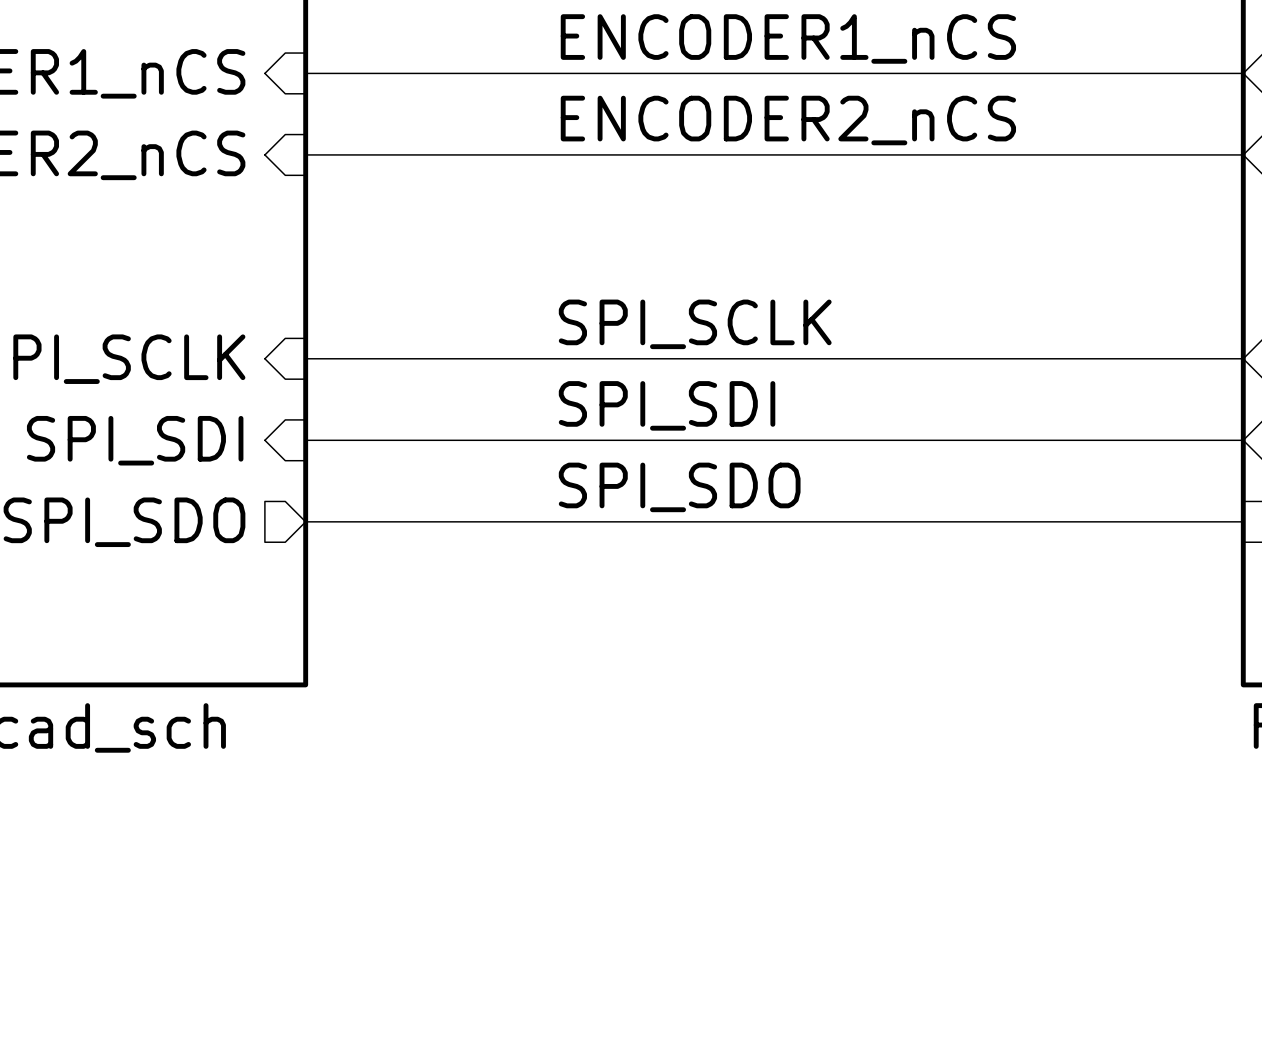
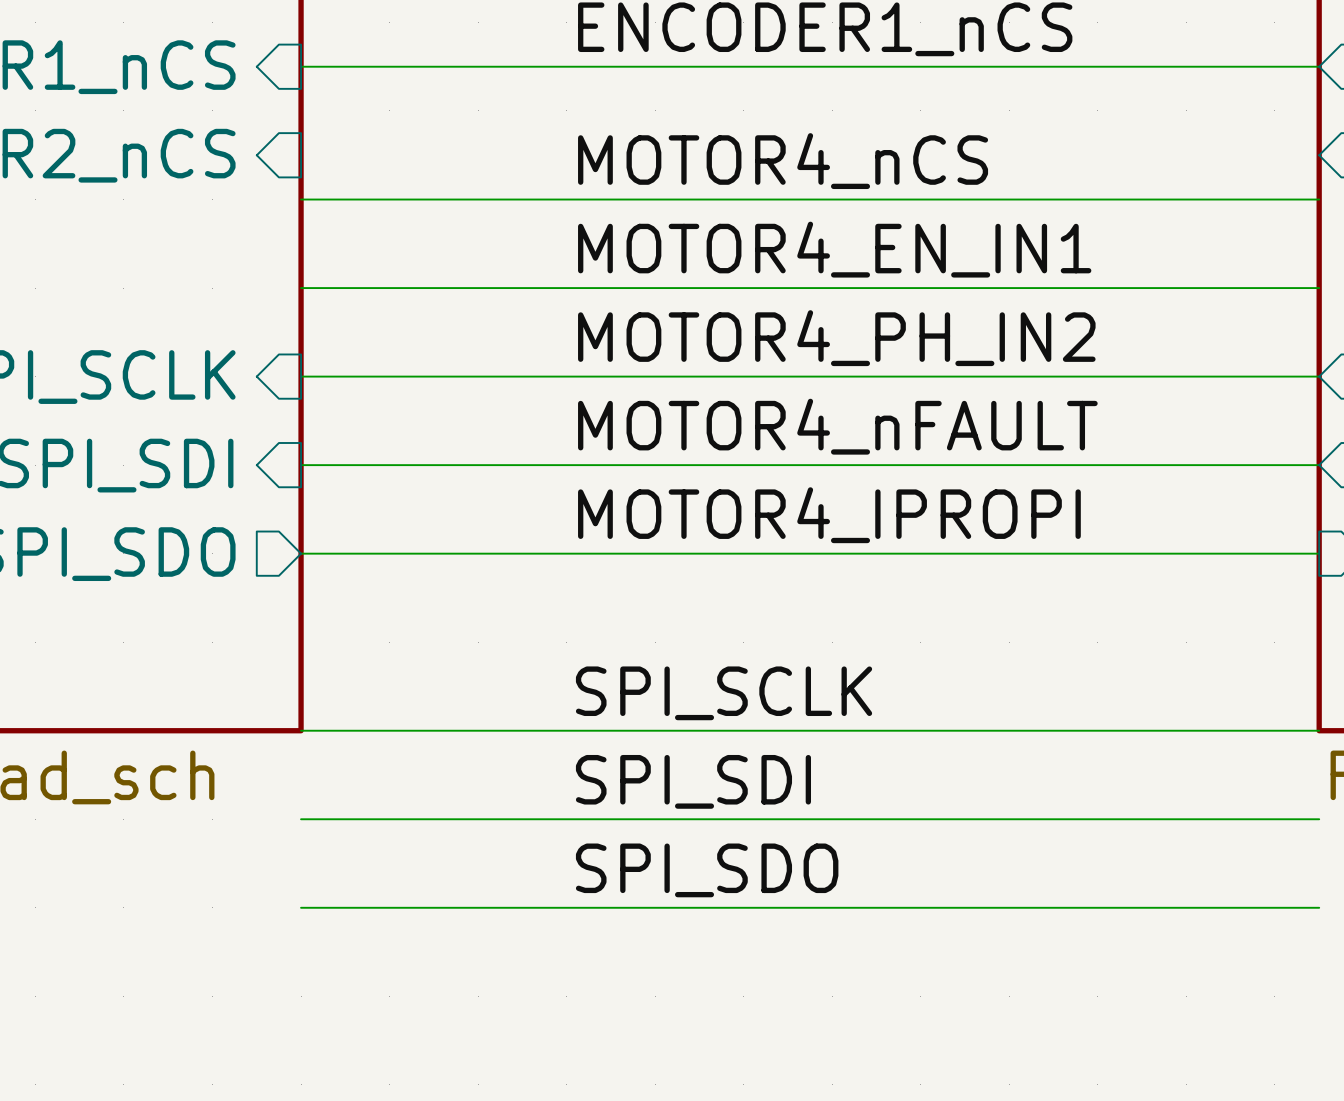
label: ENCODER2_nCS (788, 120) -> none
wire: (305, 154) (1243, 154) -> (301, 199) (1319, 199)
label: none -> MOTOR4_nCS (783, 161)
label: none -> MOTOR4_EN_IN1 (834, 249)
wire: none -> (301, 288) (1319, 288)
label: SPI_SCLK (695, 324) -> MOTOR4_PH_IN2 (836, 338)
label: SPI_SDI (667, 405) -> MOTOR4_nFAULT (837, 426)
label: SPI_SDO (679, 487) -> MOTOR4_IPROPI (829, 515)
label: none -> SPI_SCLK (724, 693)
wire: none -> (301, 730) (1319, 730)
label: none -> SPI_SDI (693, 781)
wire: none -> (301, 819) (1319, 819)
label: none -> SPI_SDO (707, 870)
wire: none -> (301, 907) (1319, 907)

